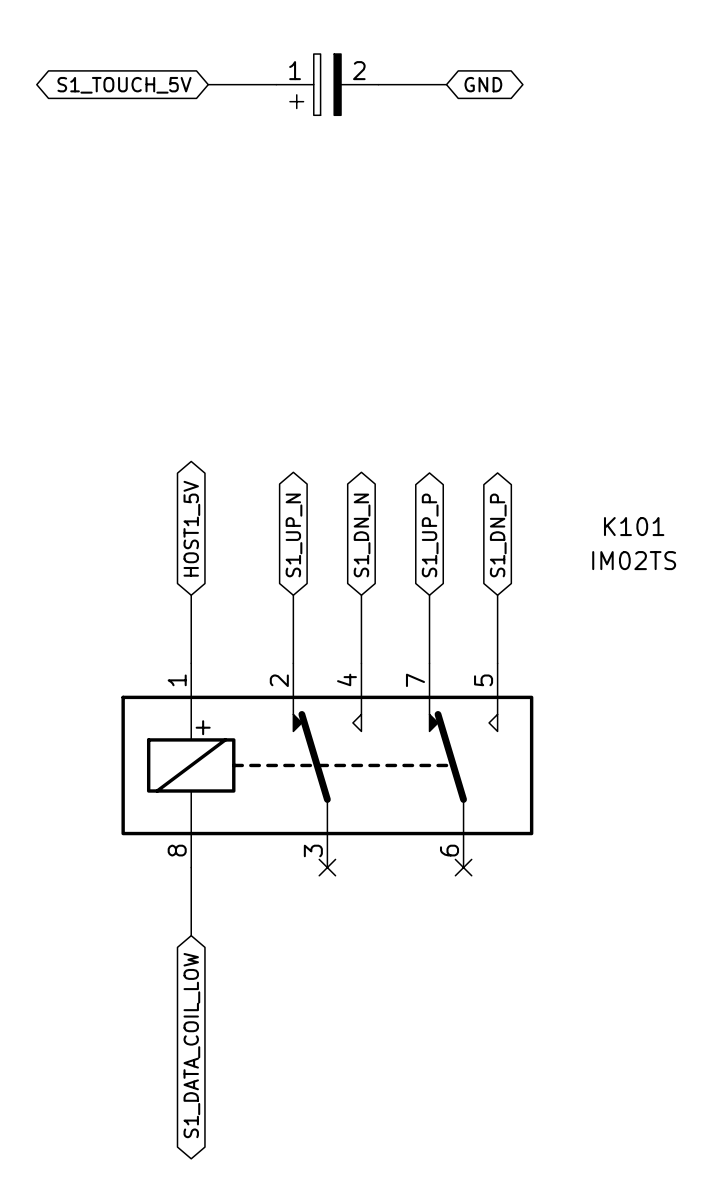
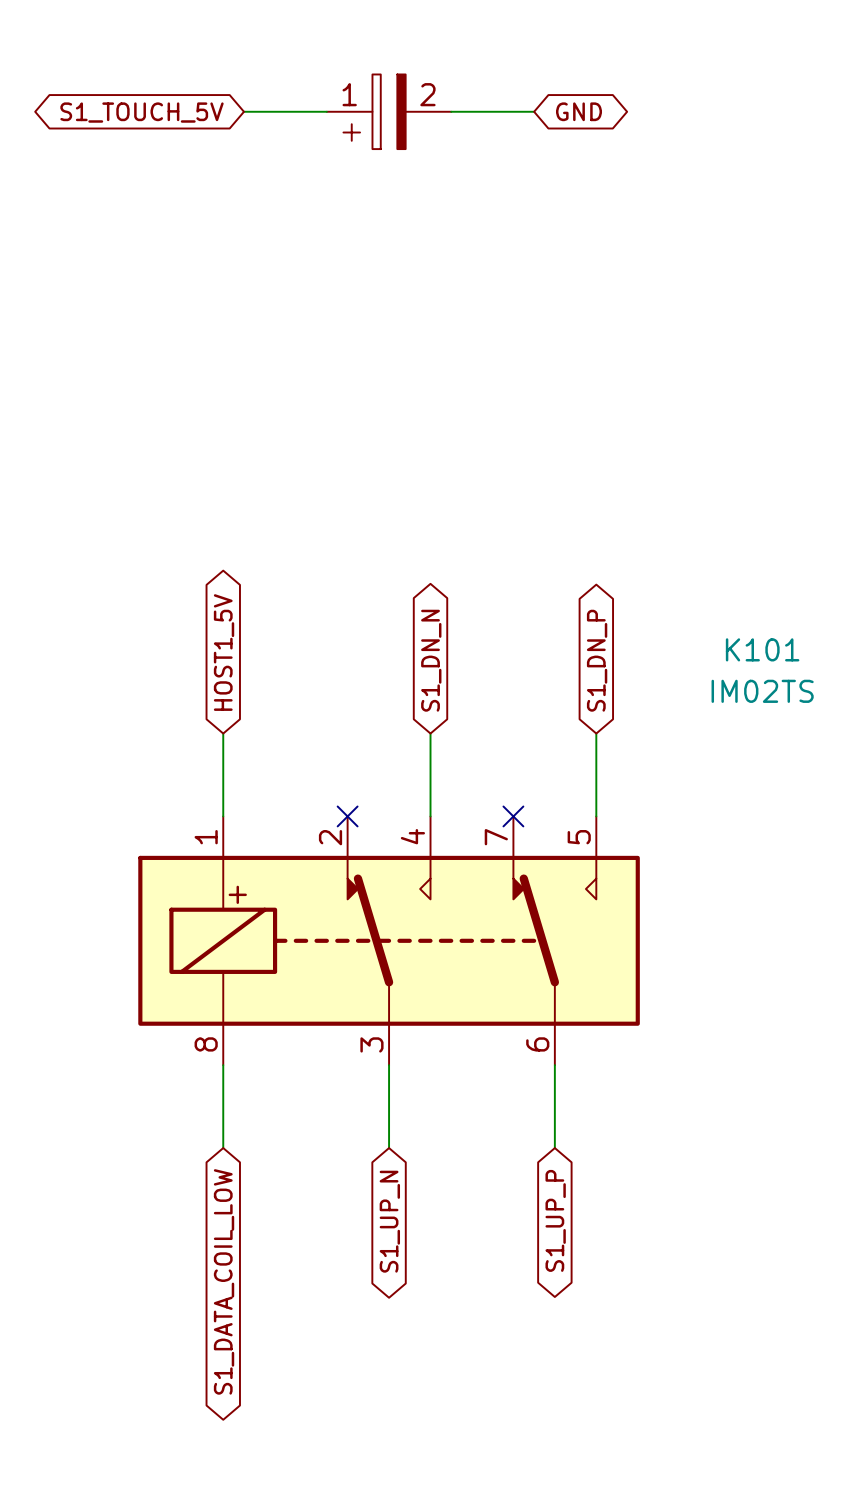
global label: S1_UP_N (293, 535) -> none
global label: S1_UP_P (430, 535) -> none
wire: (293, 595) (293, 663) -> (389, 1065) (389, 1148)
wire: (429, 595) (429, 663) -> (554, 1065) (554, 1148)
no-connect mark: none -> (347, 816)
no-connect mark: none -> (513, 816)
no-connect mark: (327, 867) -> none
no-connect mark: (463, 867) -> none
global label: none -> S1_UP_P (555, 1220)
global label: none -> S1_UP_N (389, 1221)

